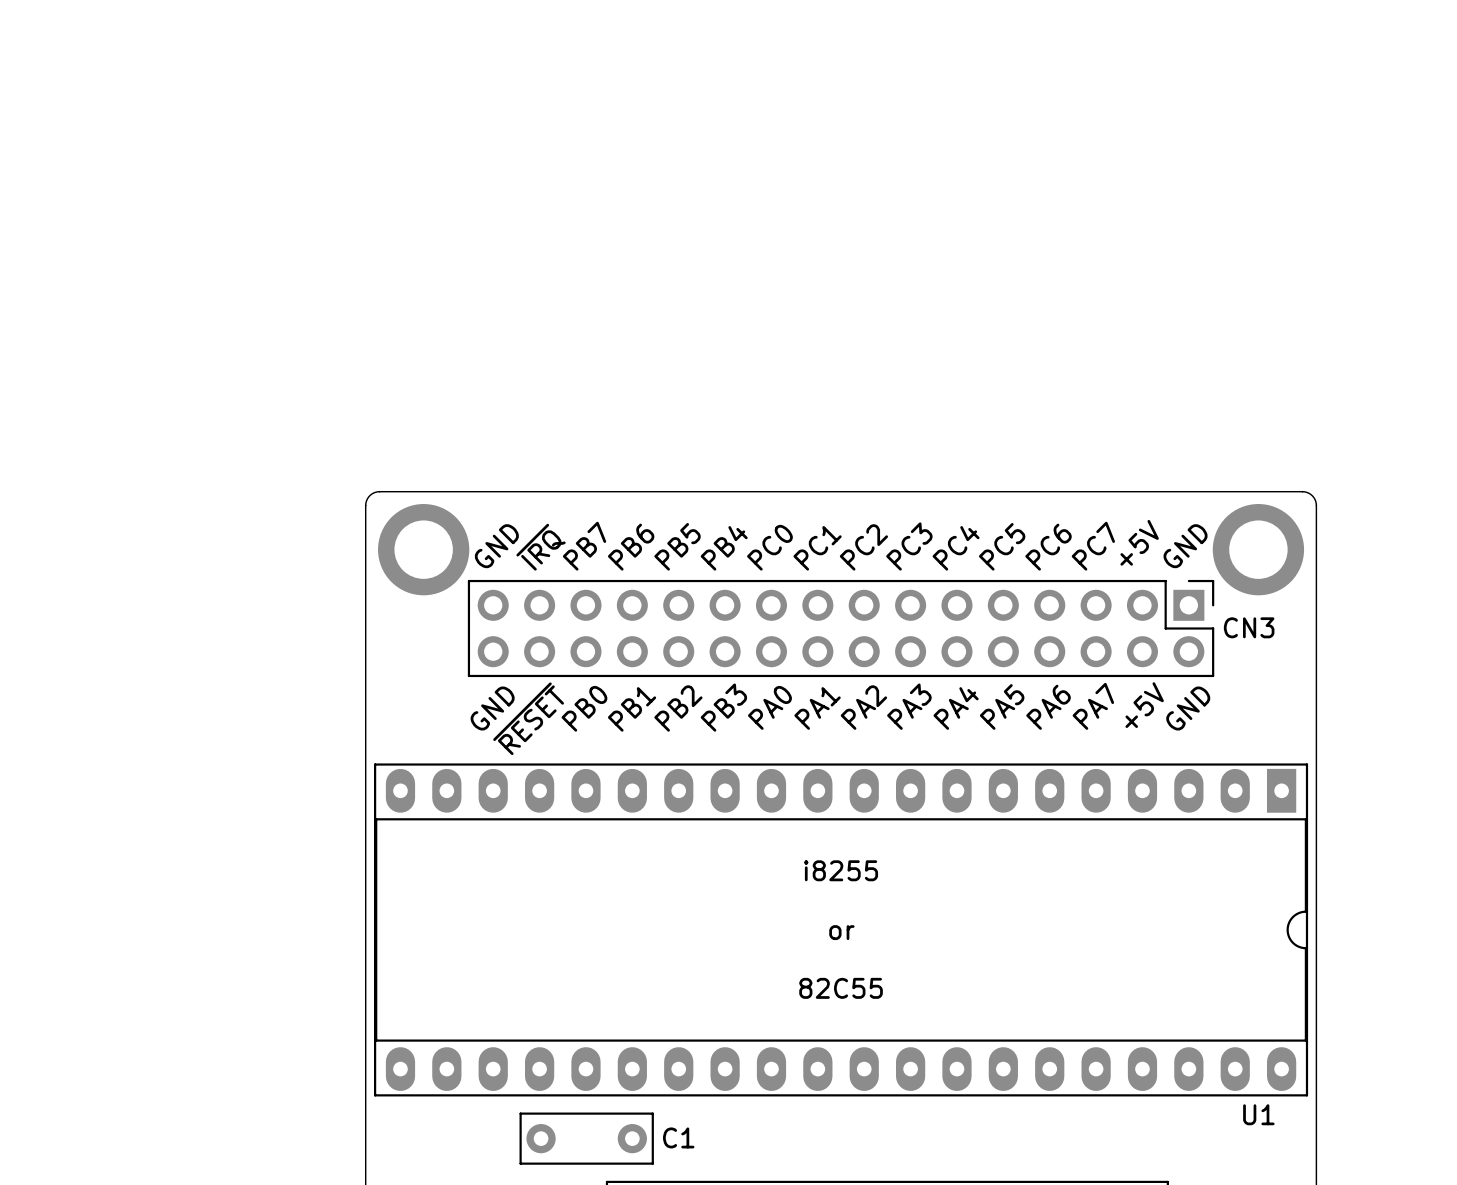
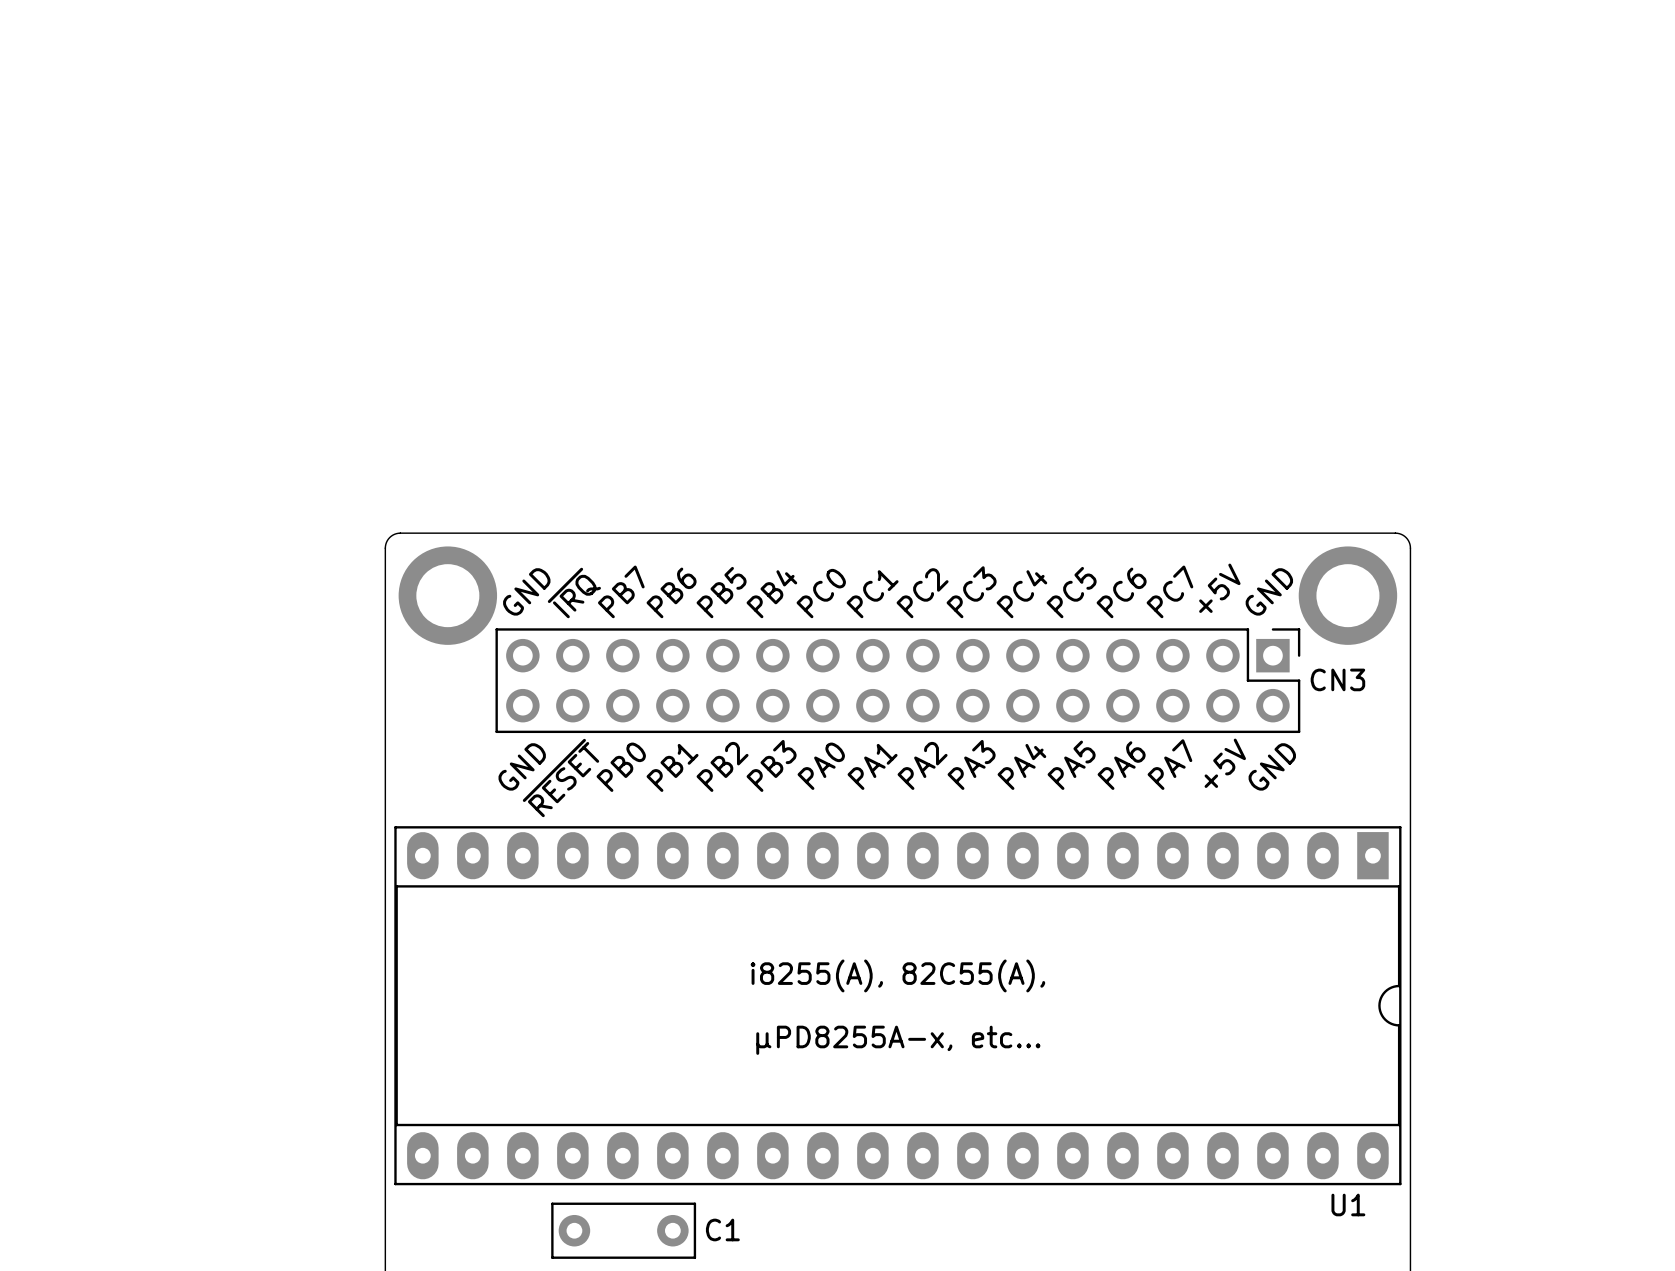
text: i8255 (841, 870) -> none
text: none -> i8255(A), 82C55(A), (897, 975)
text: or (841, 932) -> none
text: none -> μPD8255A-x, etc... (898, 1040)
text: 82C55 (841, 988) -> none

